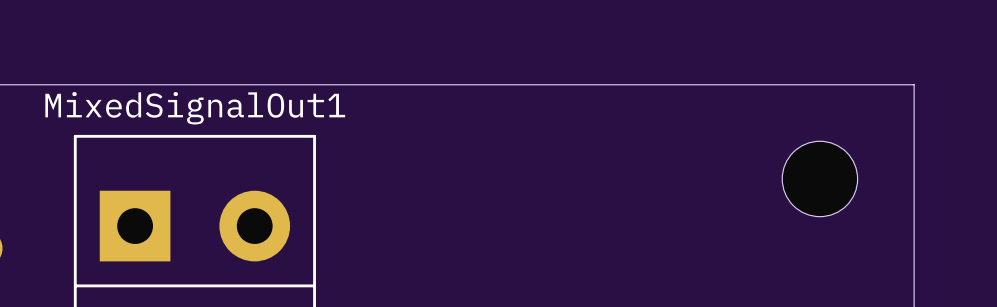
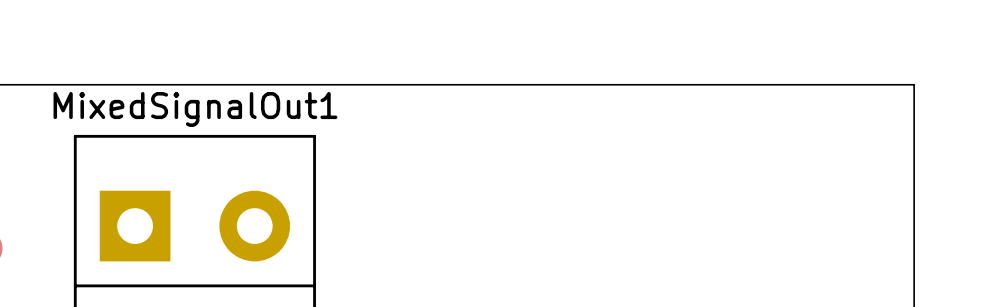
part: (819, 178) -> none

